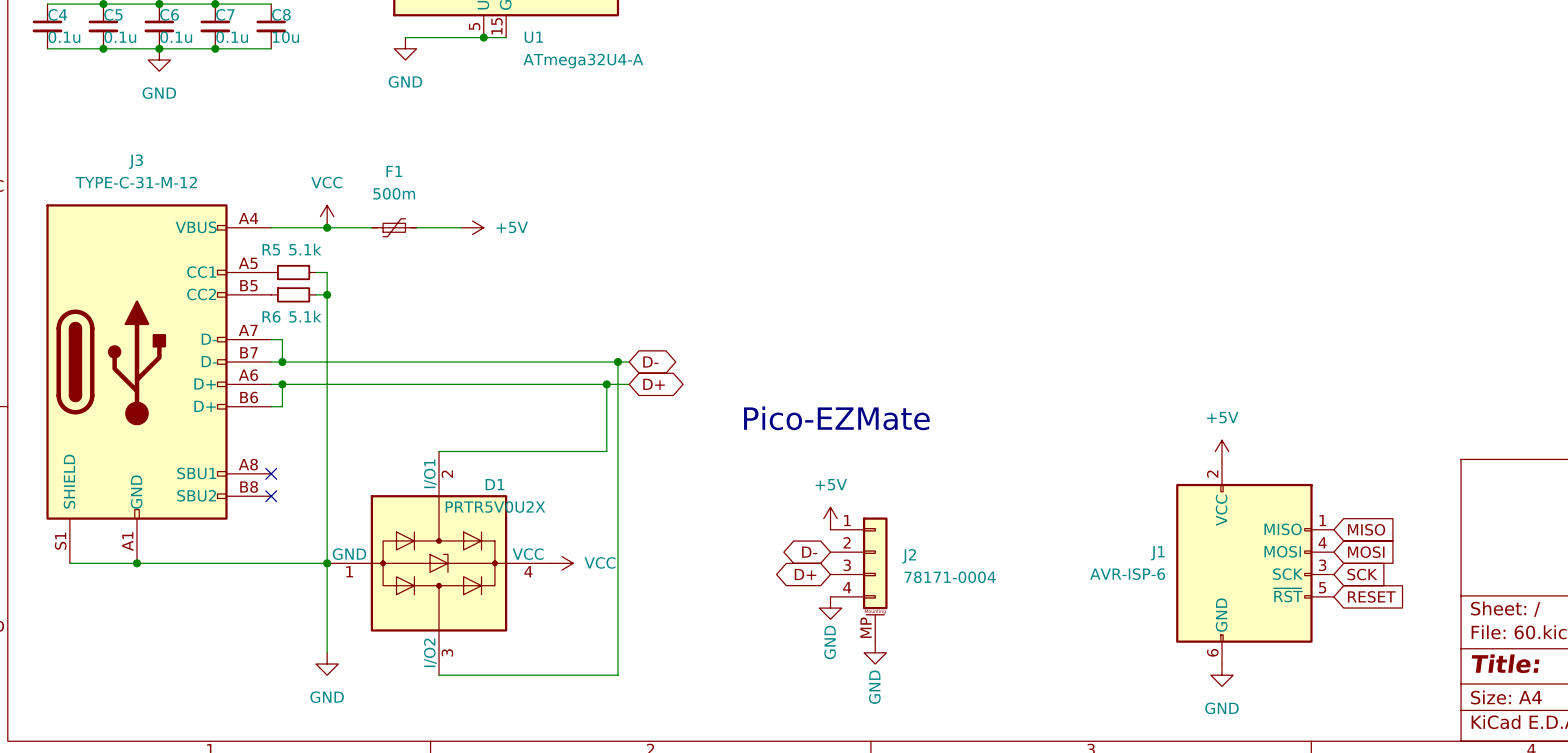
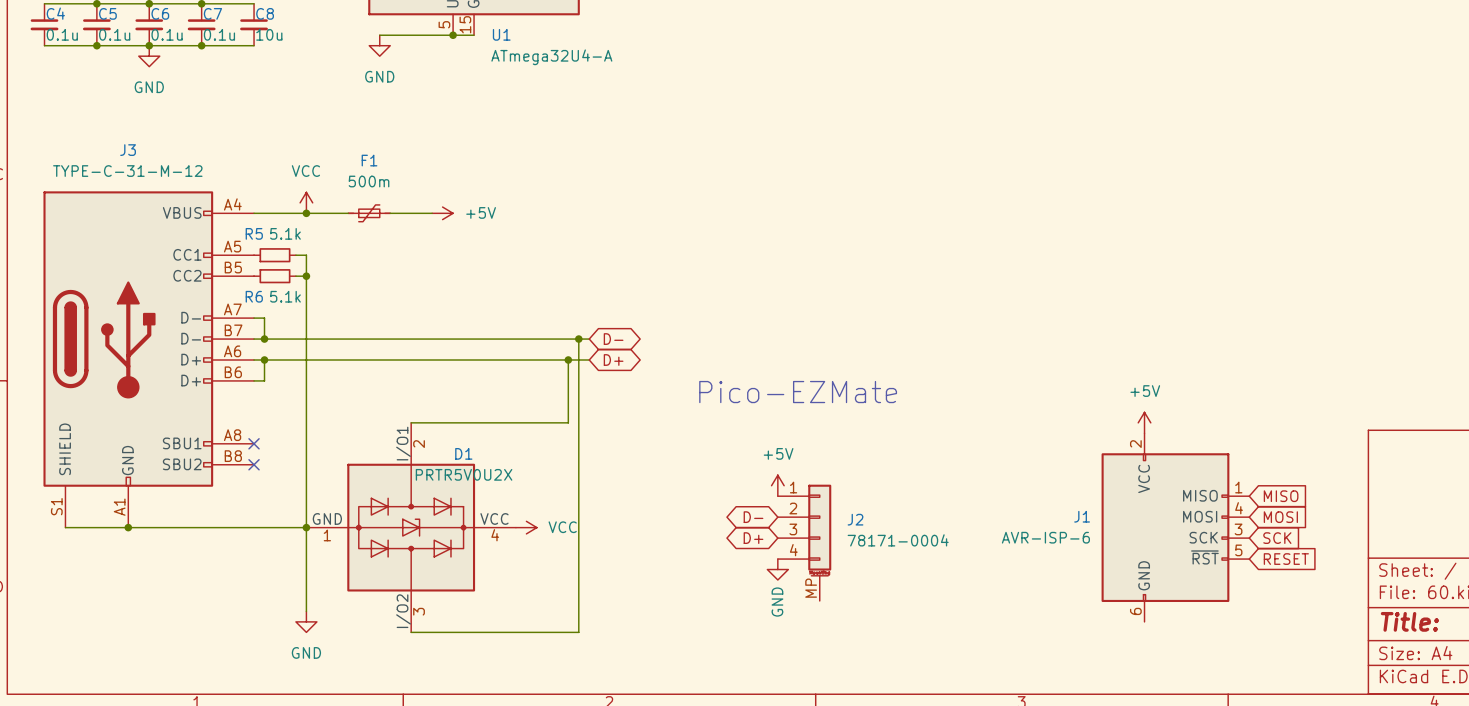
power symbol: GND (875, 652) -> none
power symbol: GND (1222, 675) -> none

